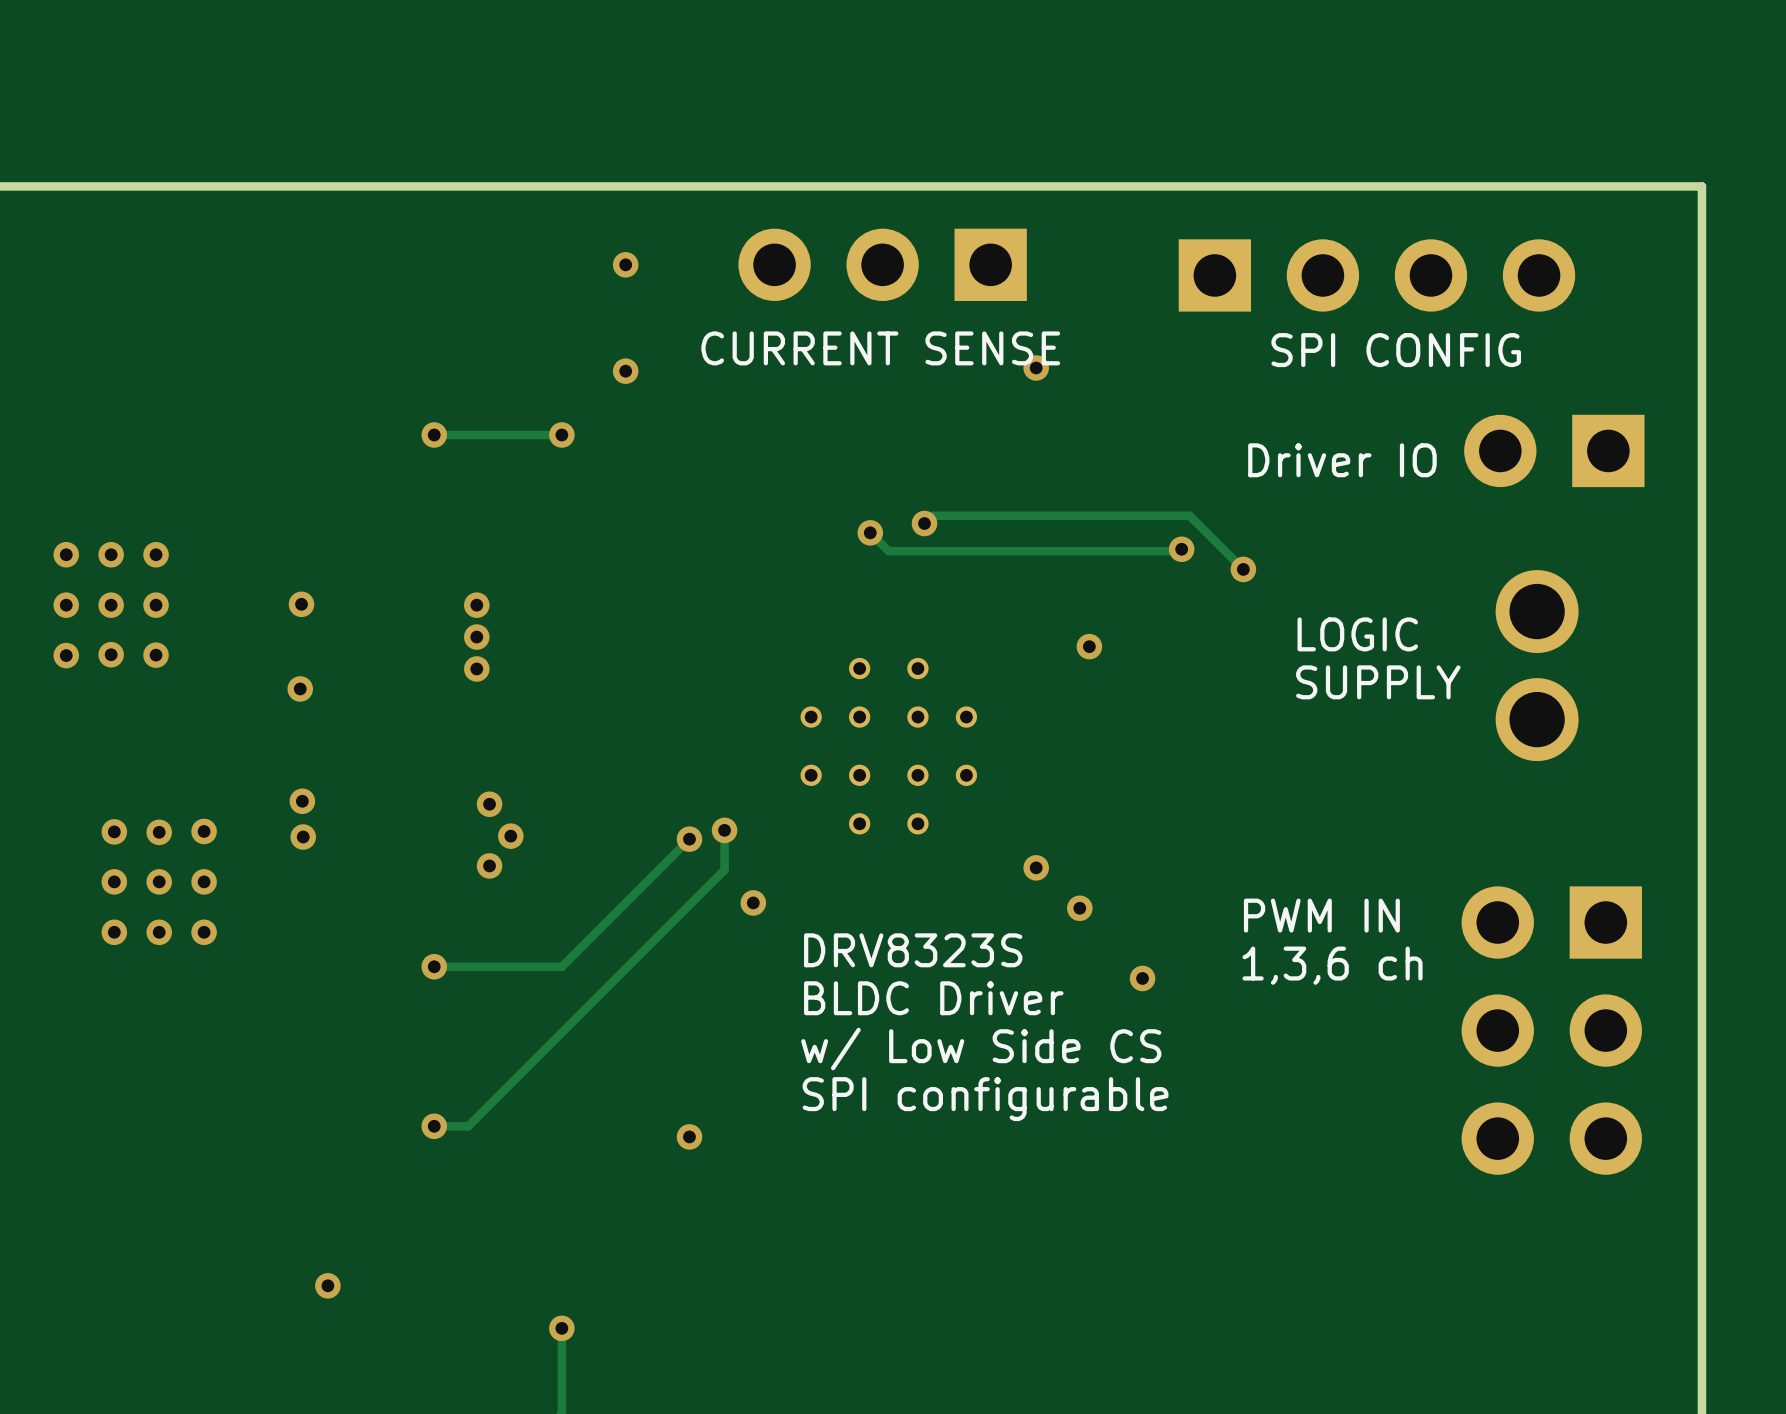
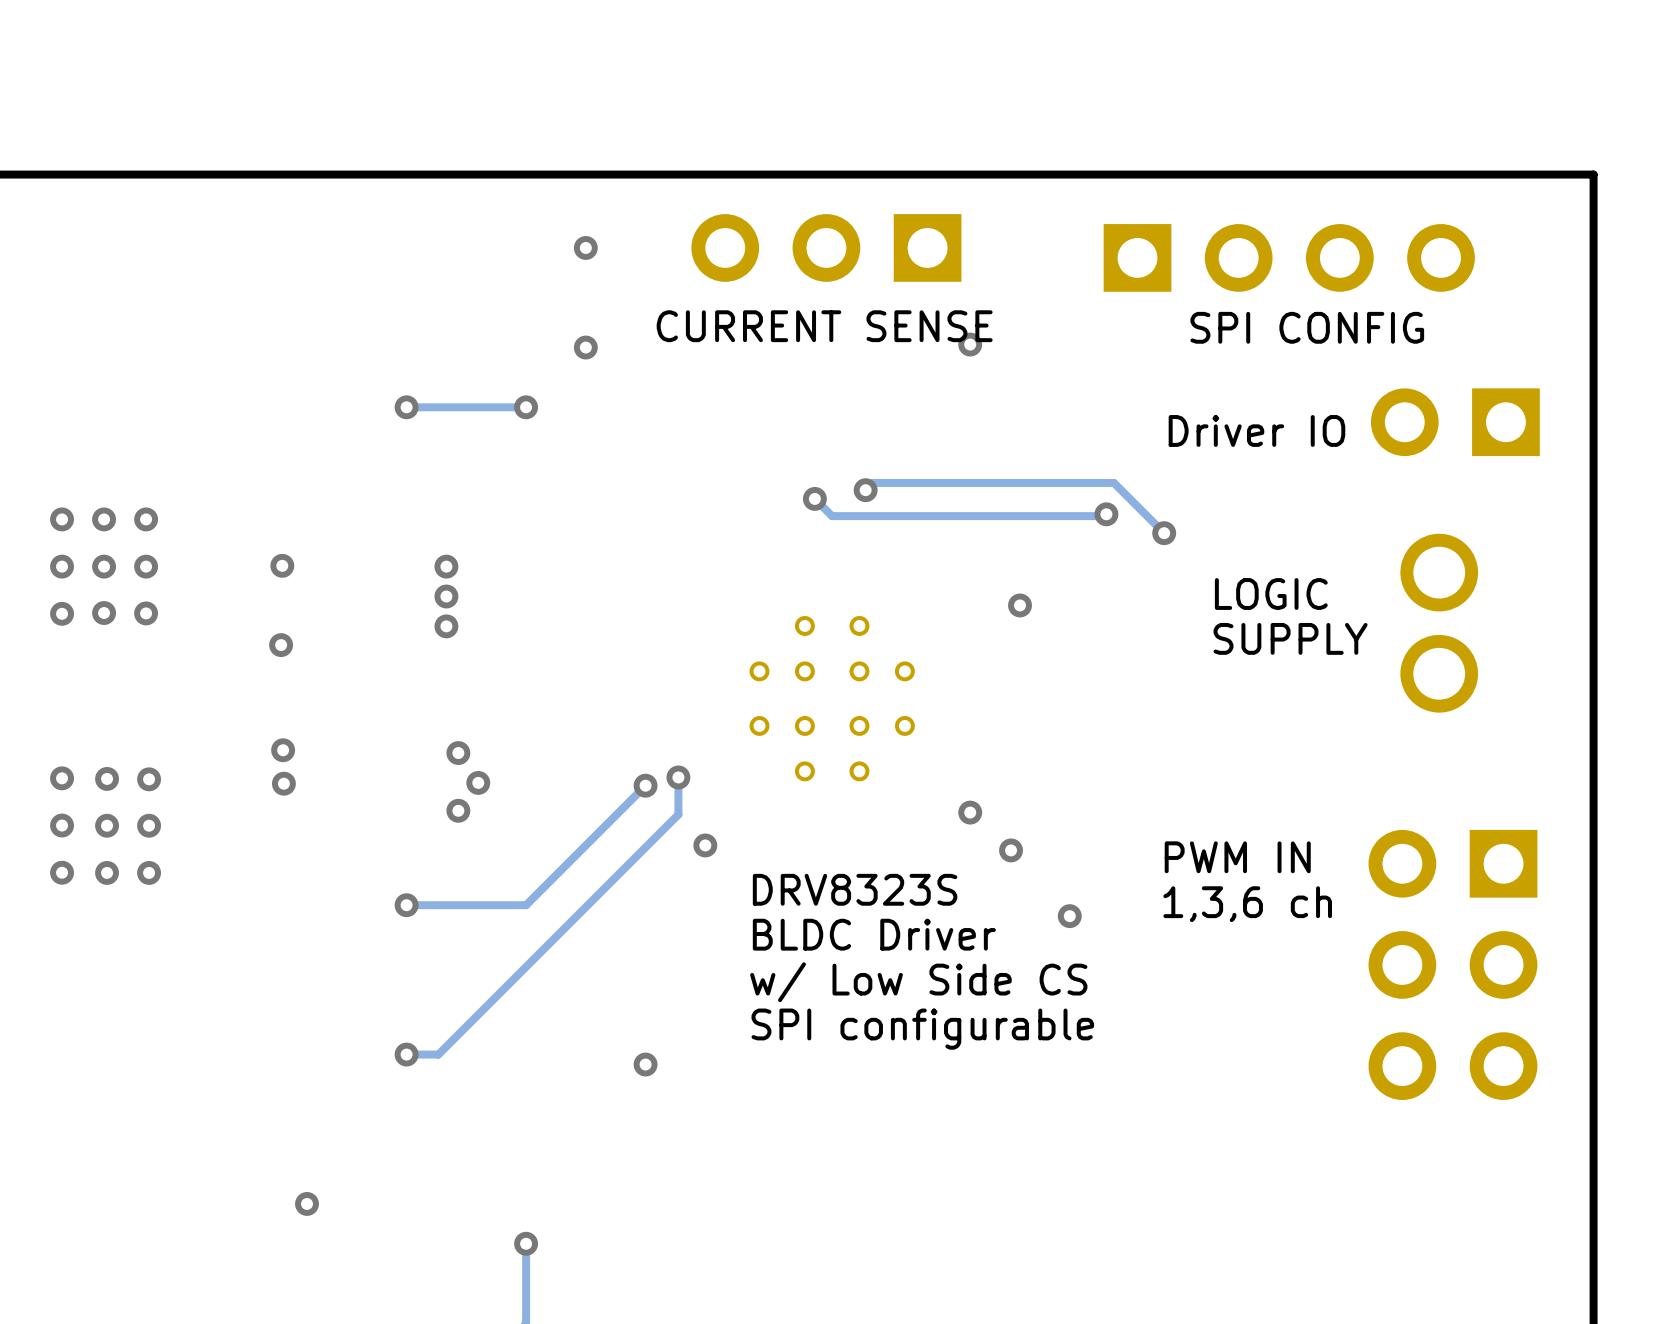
via: none -> (62, 778)
via: (204, 831) -> none
via: none -> (62, 825)
via: (204, 881) -> none
via: none -> (62, 872)
via: (204, 932) -> none

